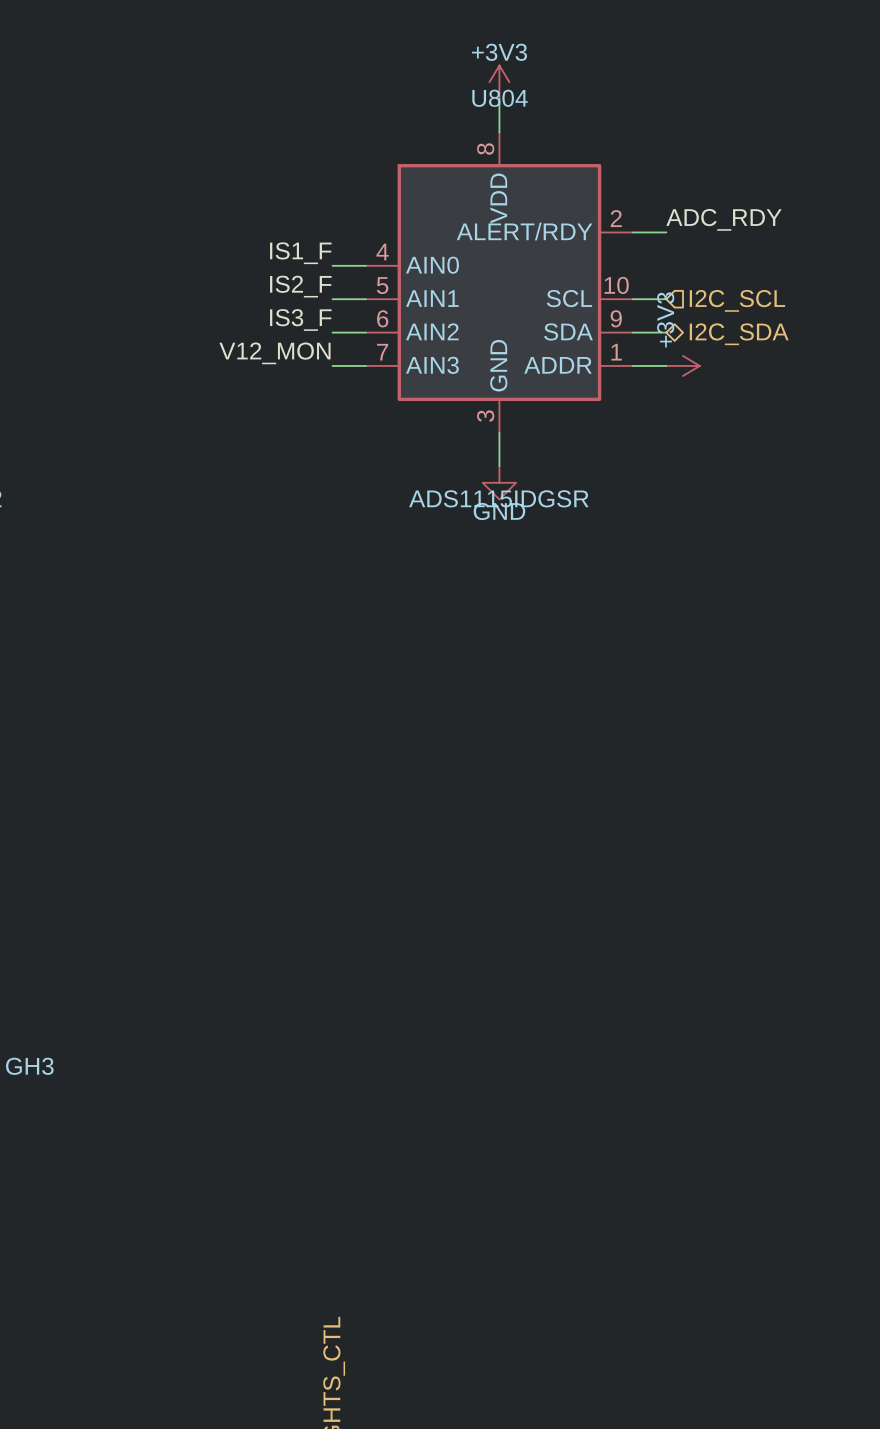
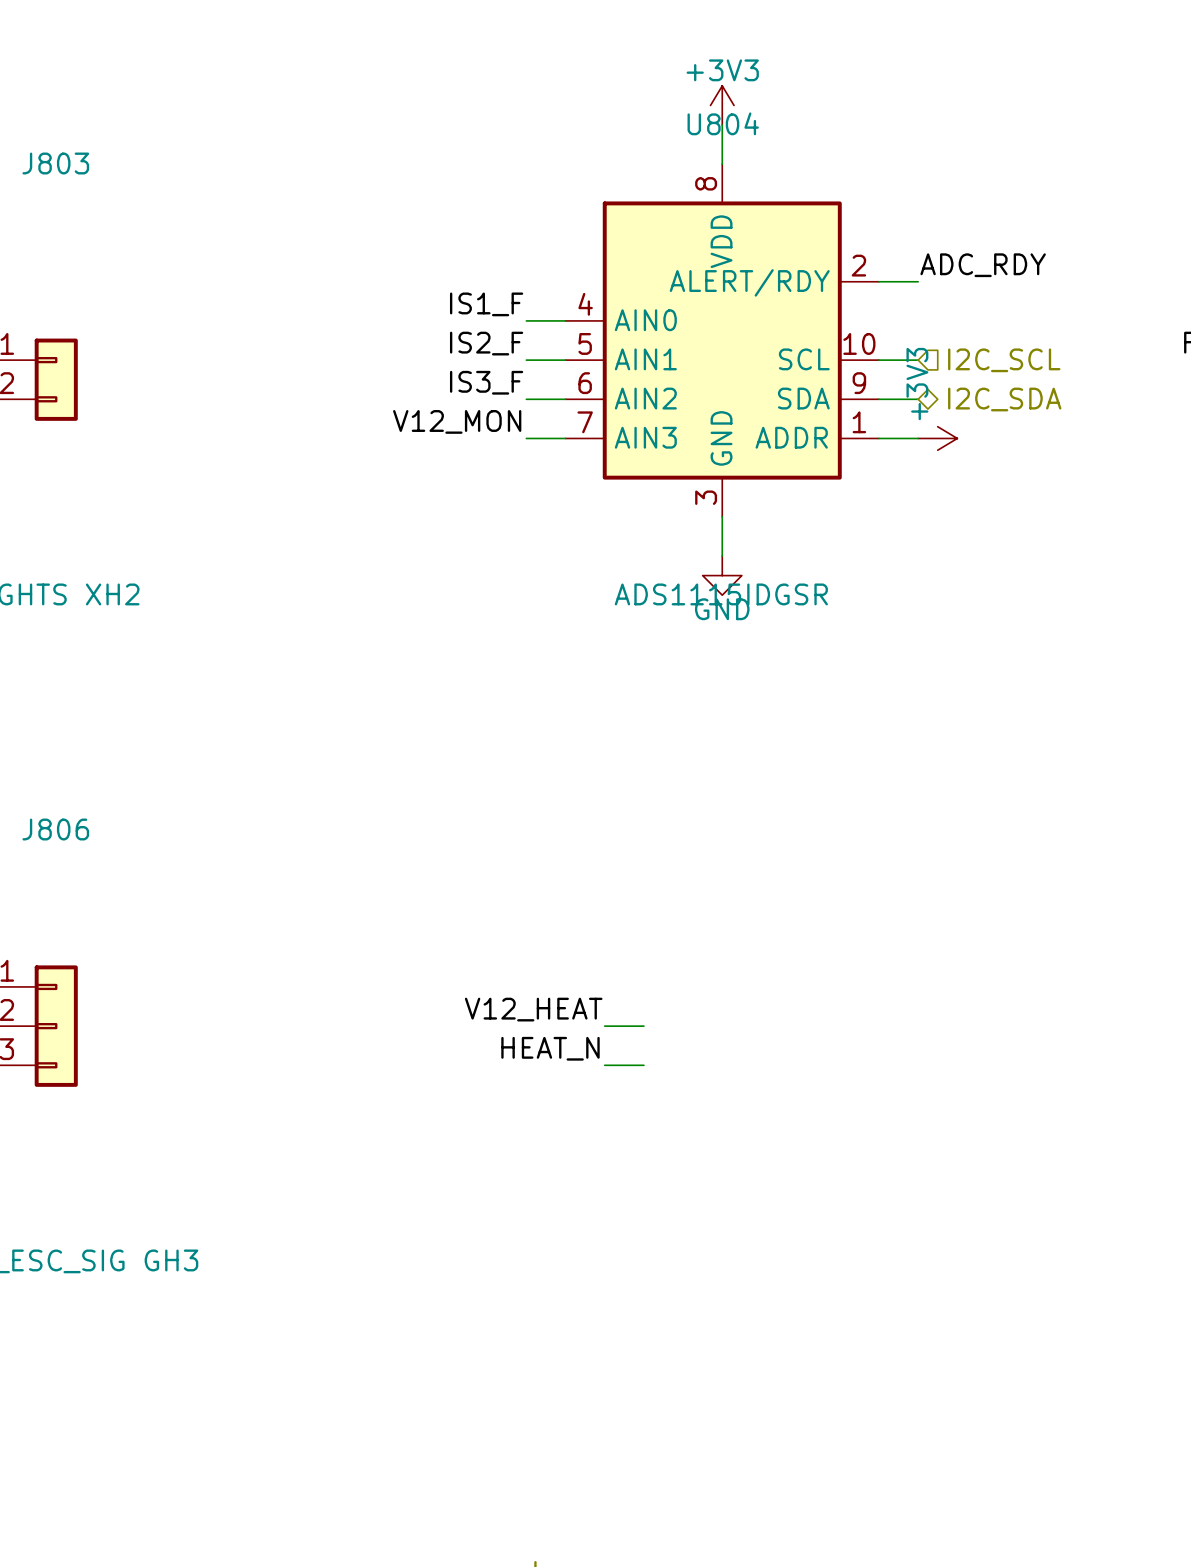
label: none -> V12_HEAT (533, 1009)
wire: none -> (604, 1026) (643, 1026)
label: none -> HEAT_N (550, 1048)
wire: none -> (604, 1065) (643, 1065)

